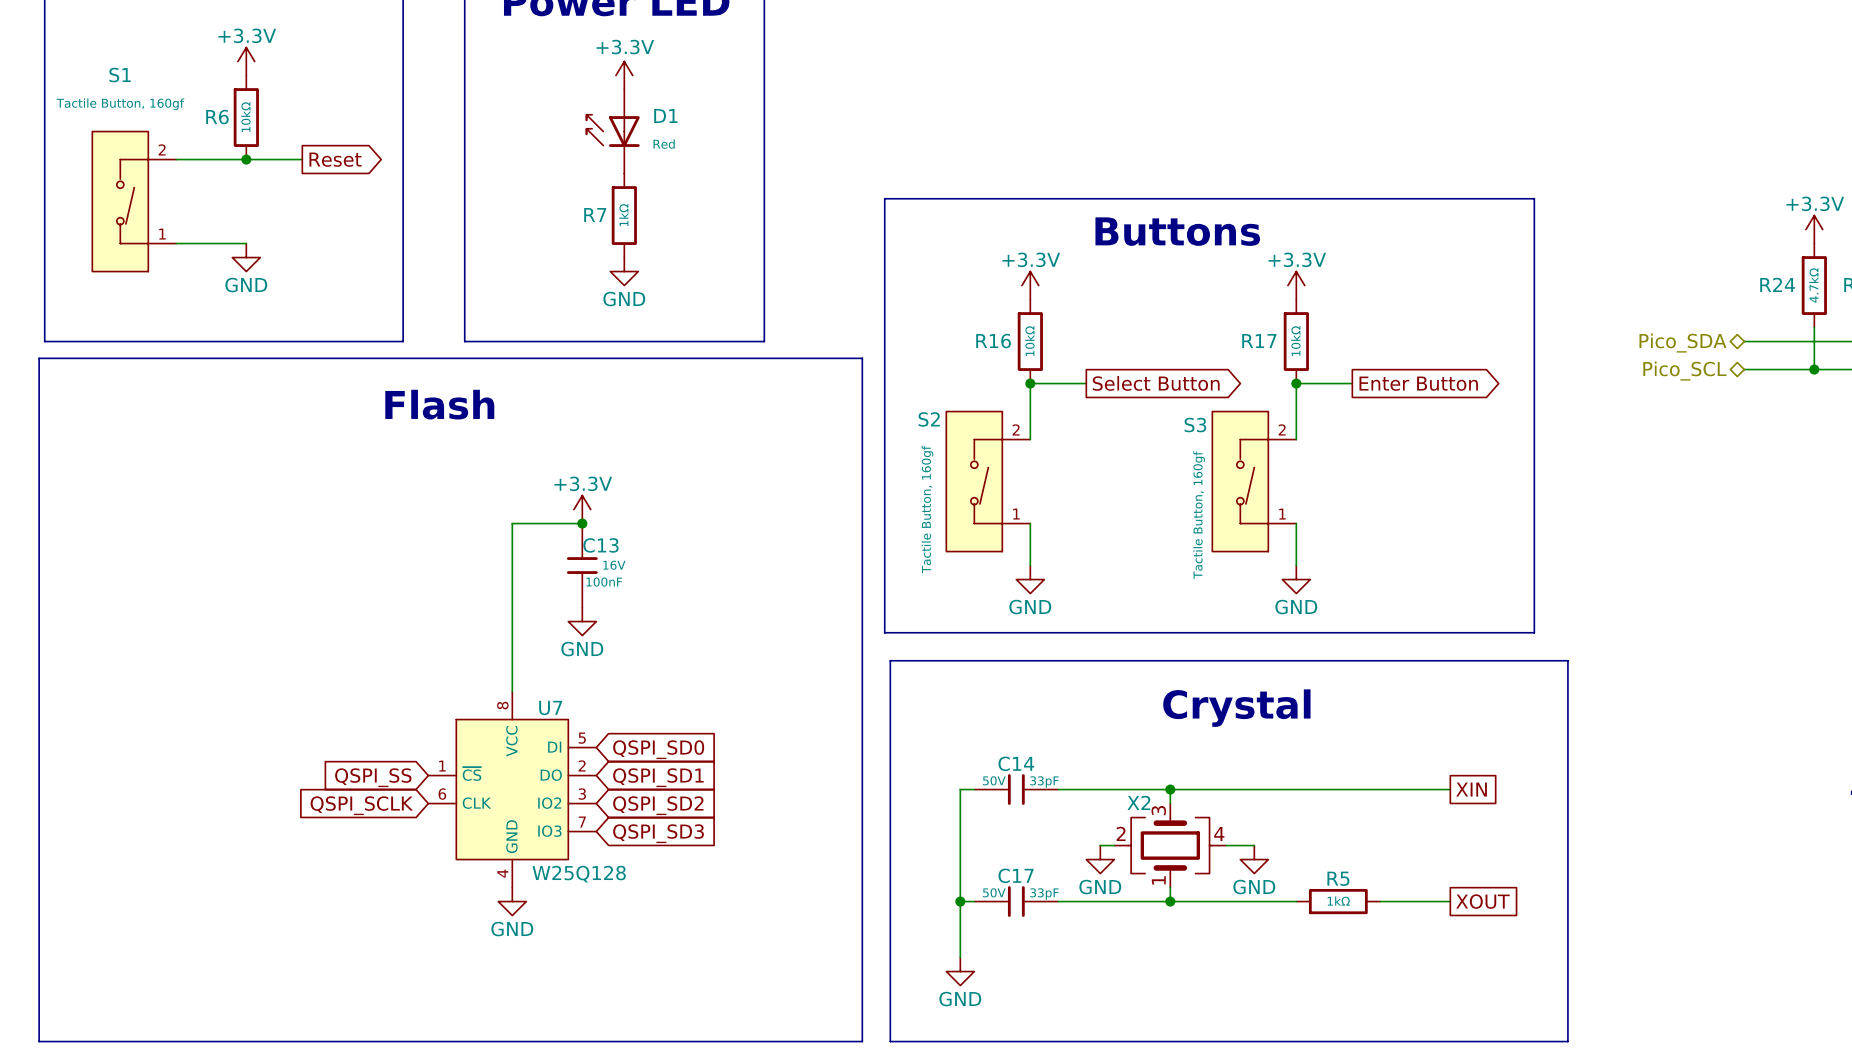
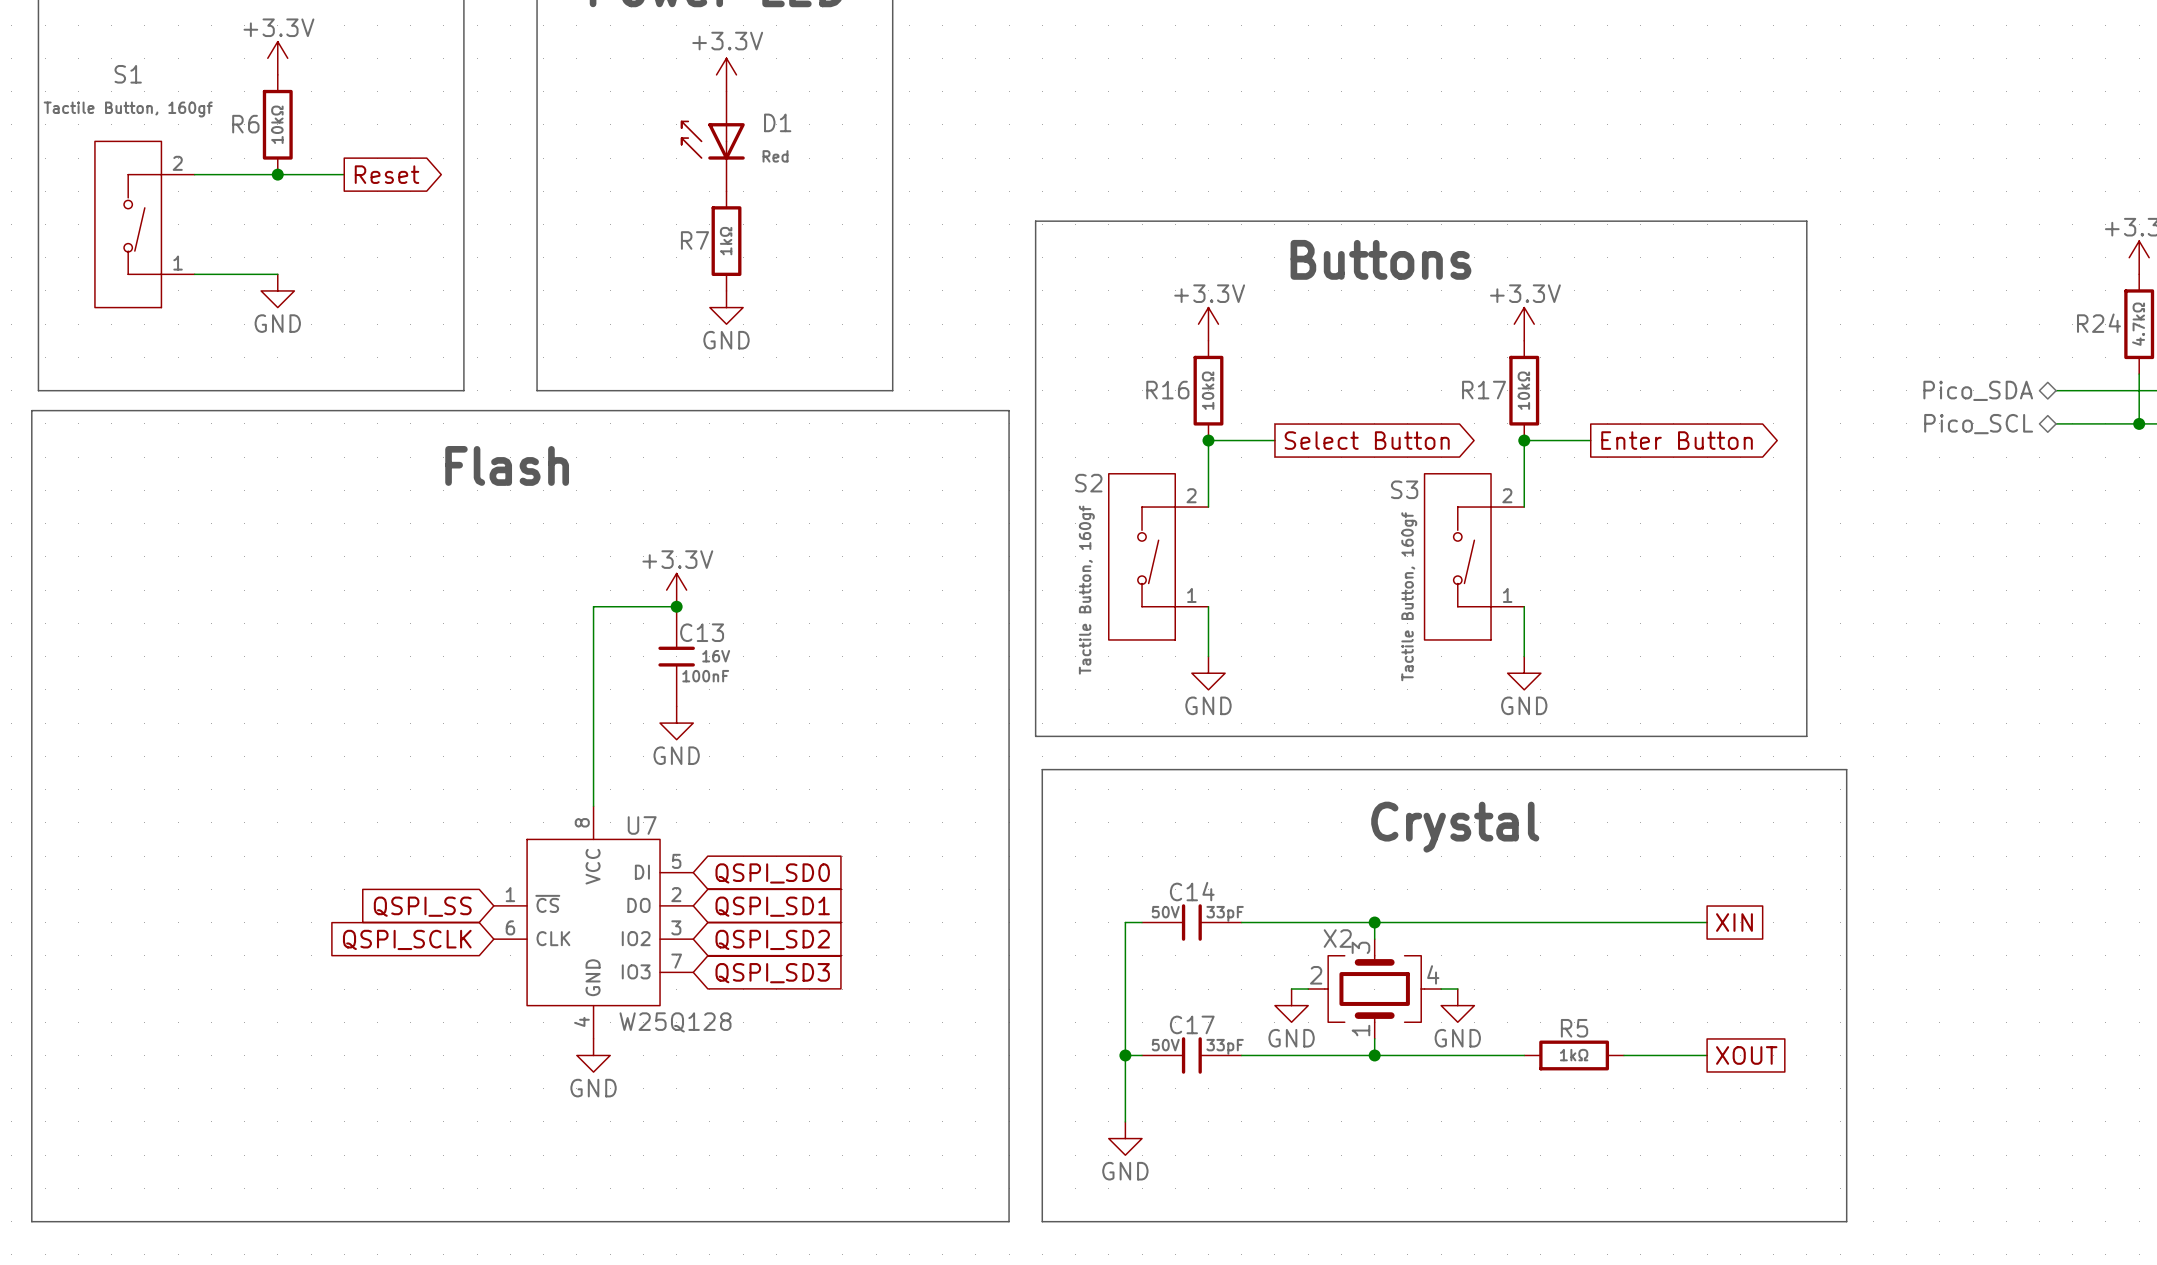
wire: (1240, 845) (1254, 845) -> none
power symbol position: GND (1254, 859) -> GND (1457, 1005)

